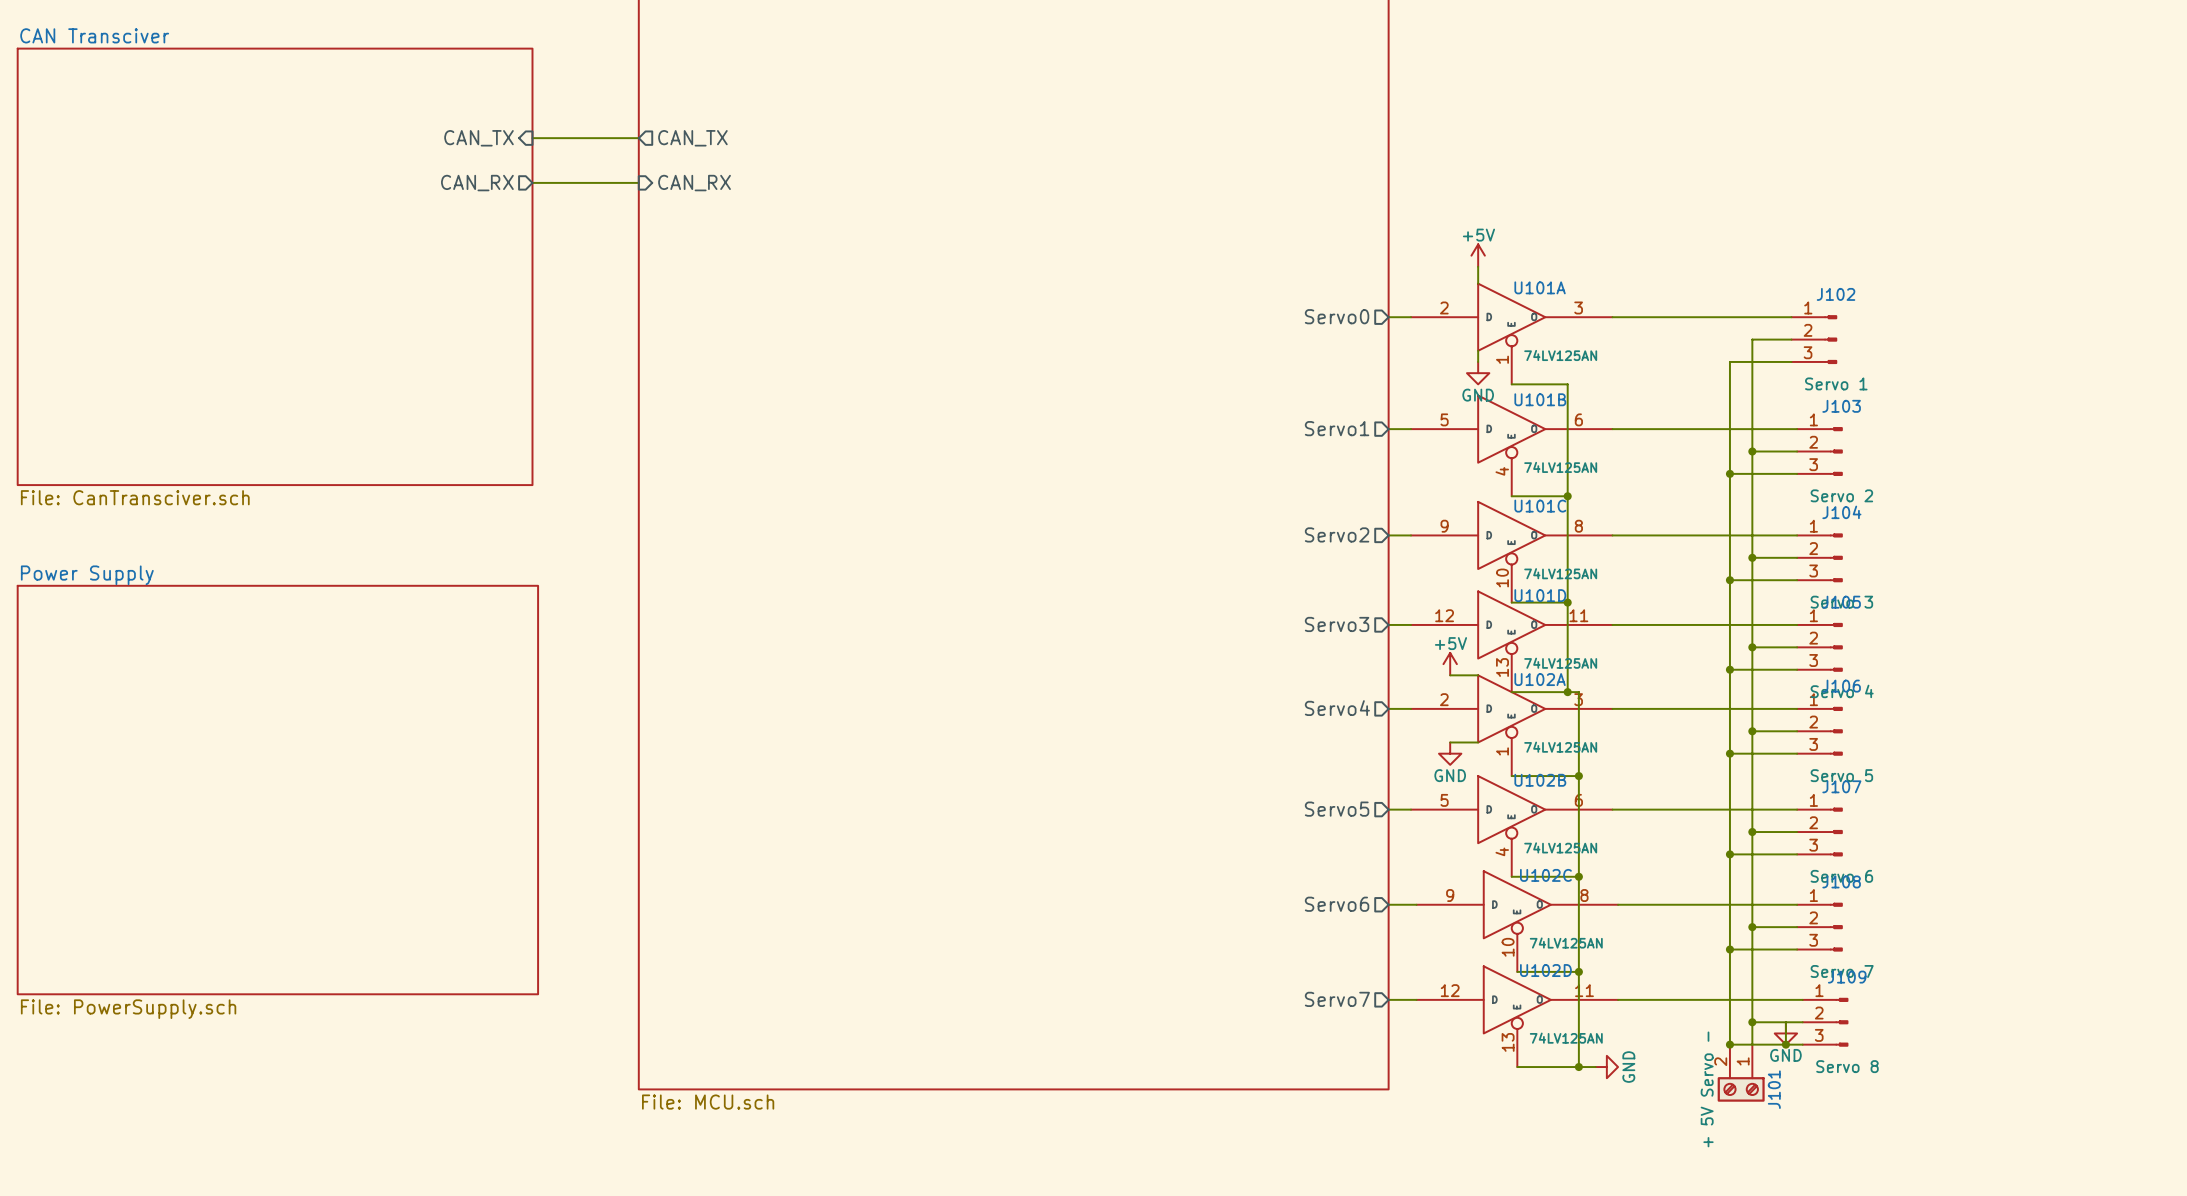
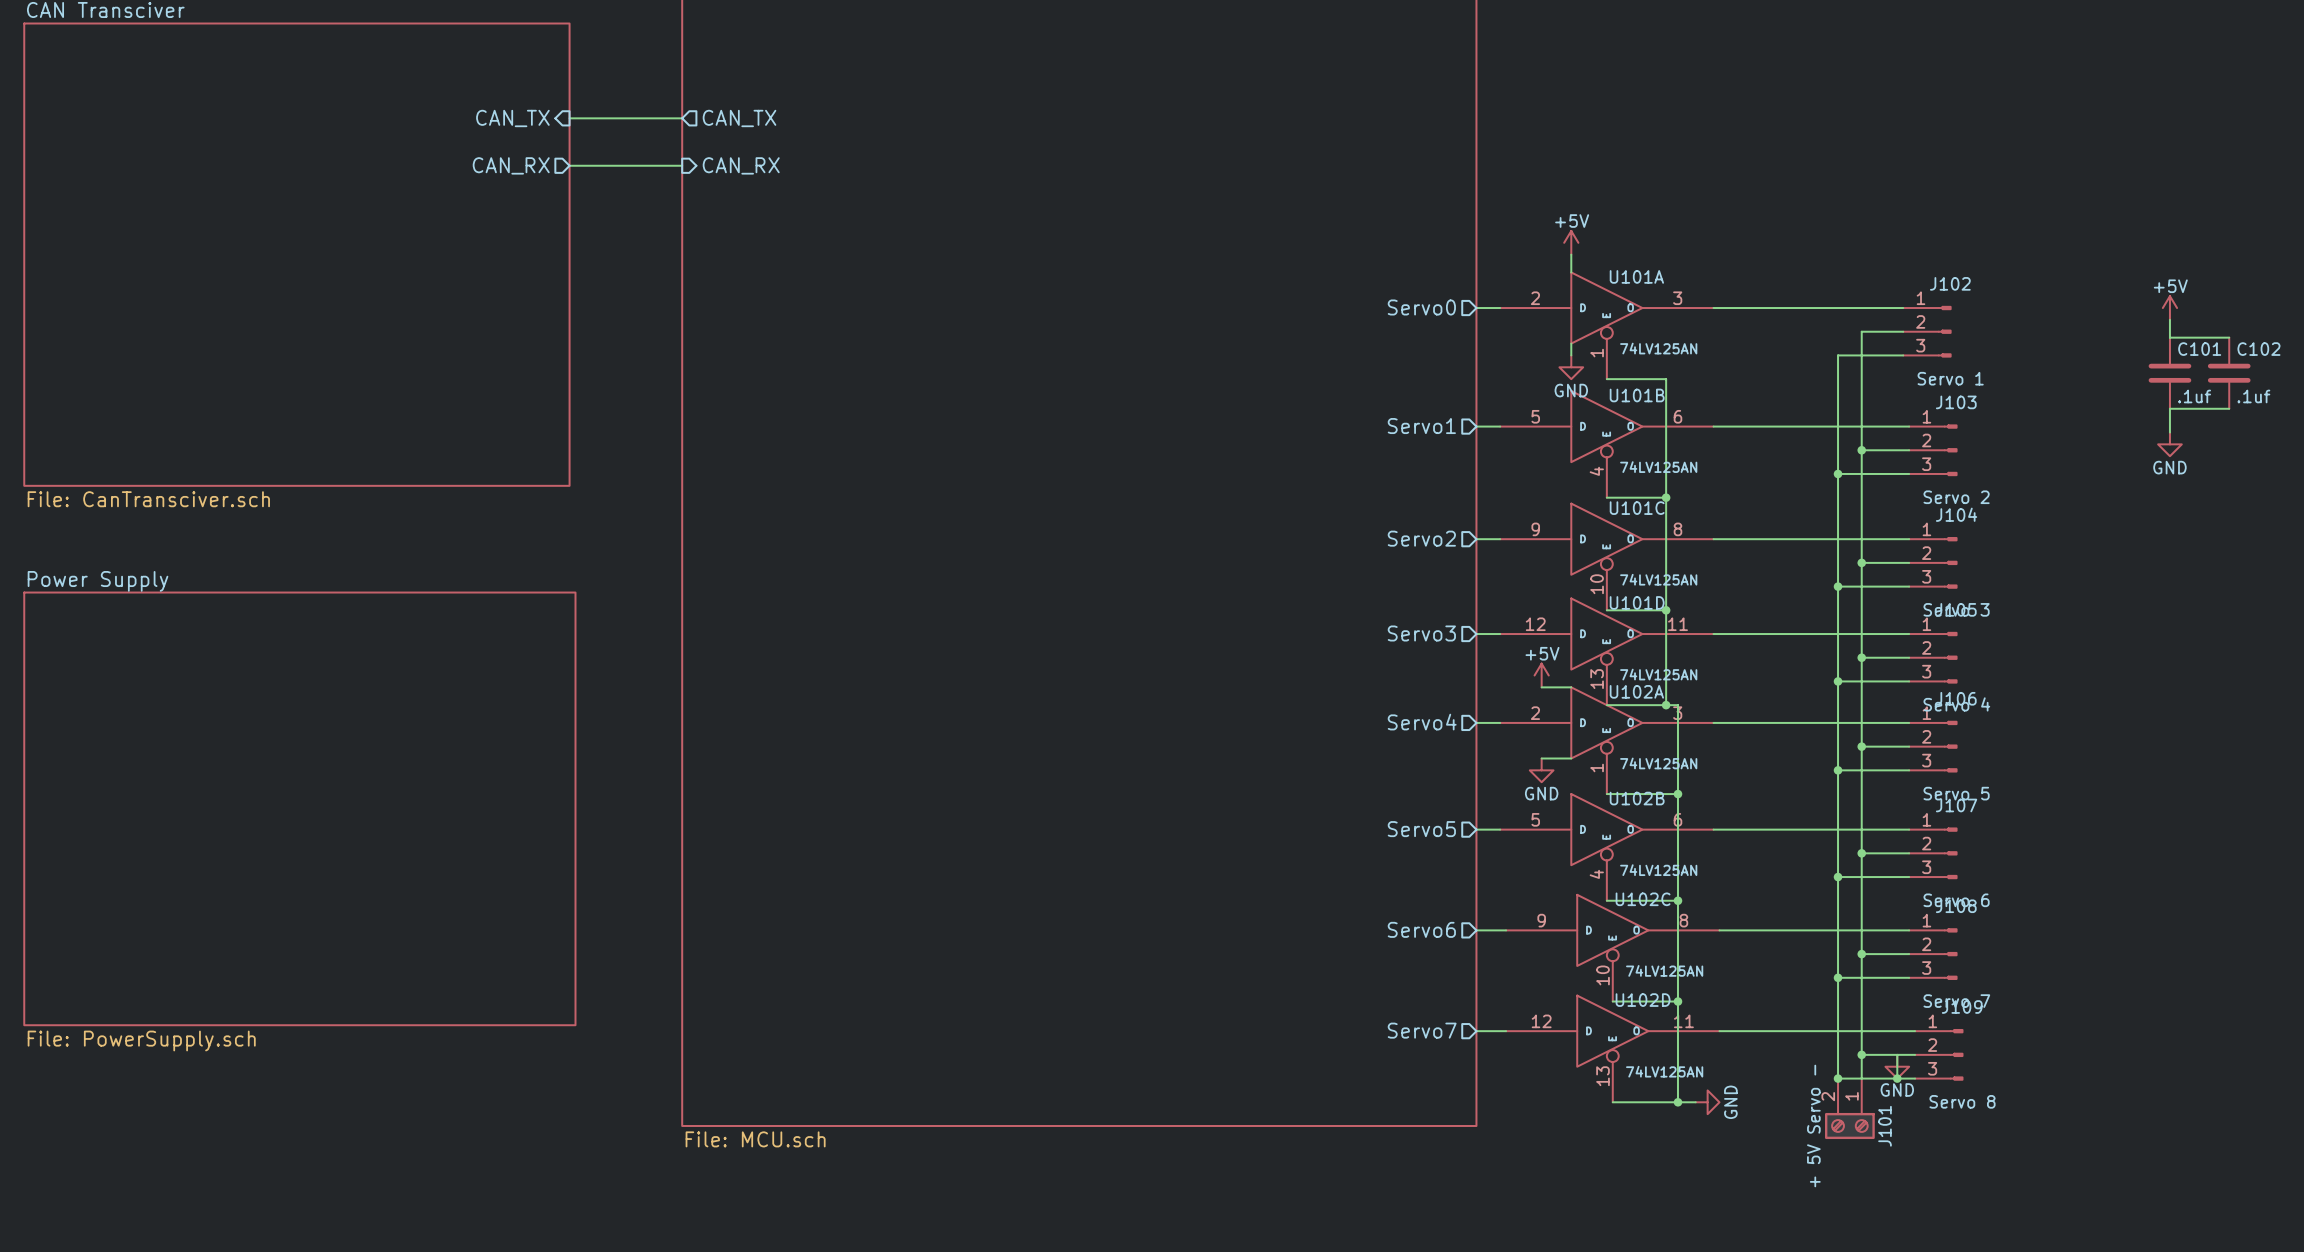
power symbol: none -> +5V (2169, 308)
wire: none -> (2169, 319) (2169, 337) (2229, 337)
C101: none -> .1uf (2169, 373)
C102: none -> .1uf (2229, 373)
wire: none -> (2229, 408) (2169, 408) (2169, 432)
power symbol: none -> GND (2169, 444)

